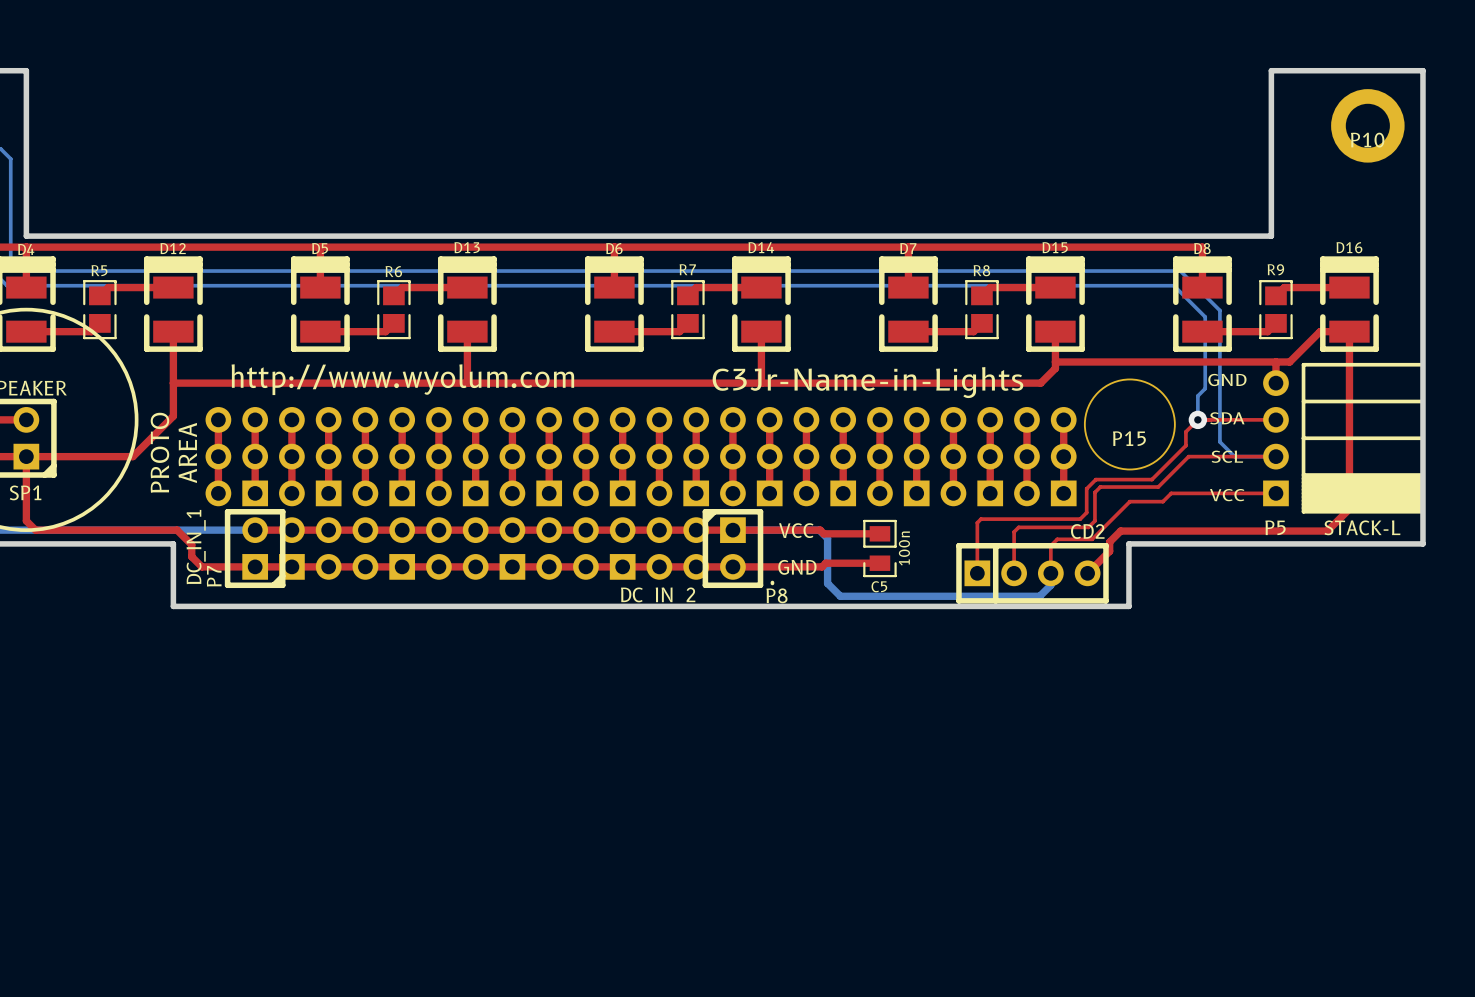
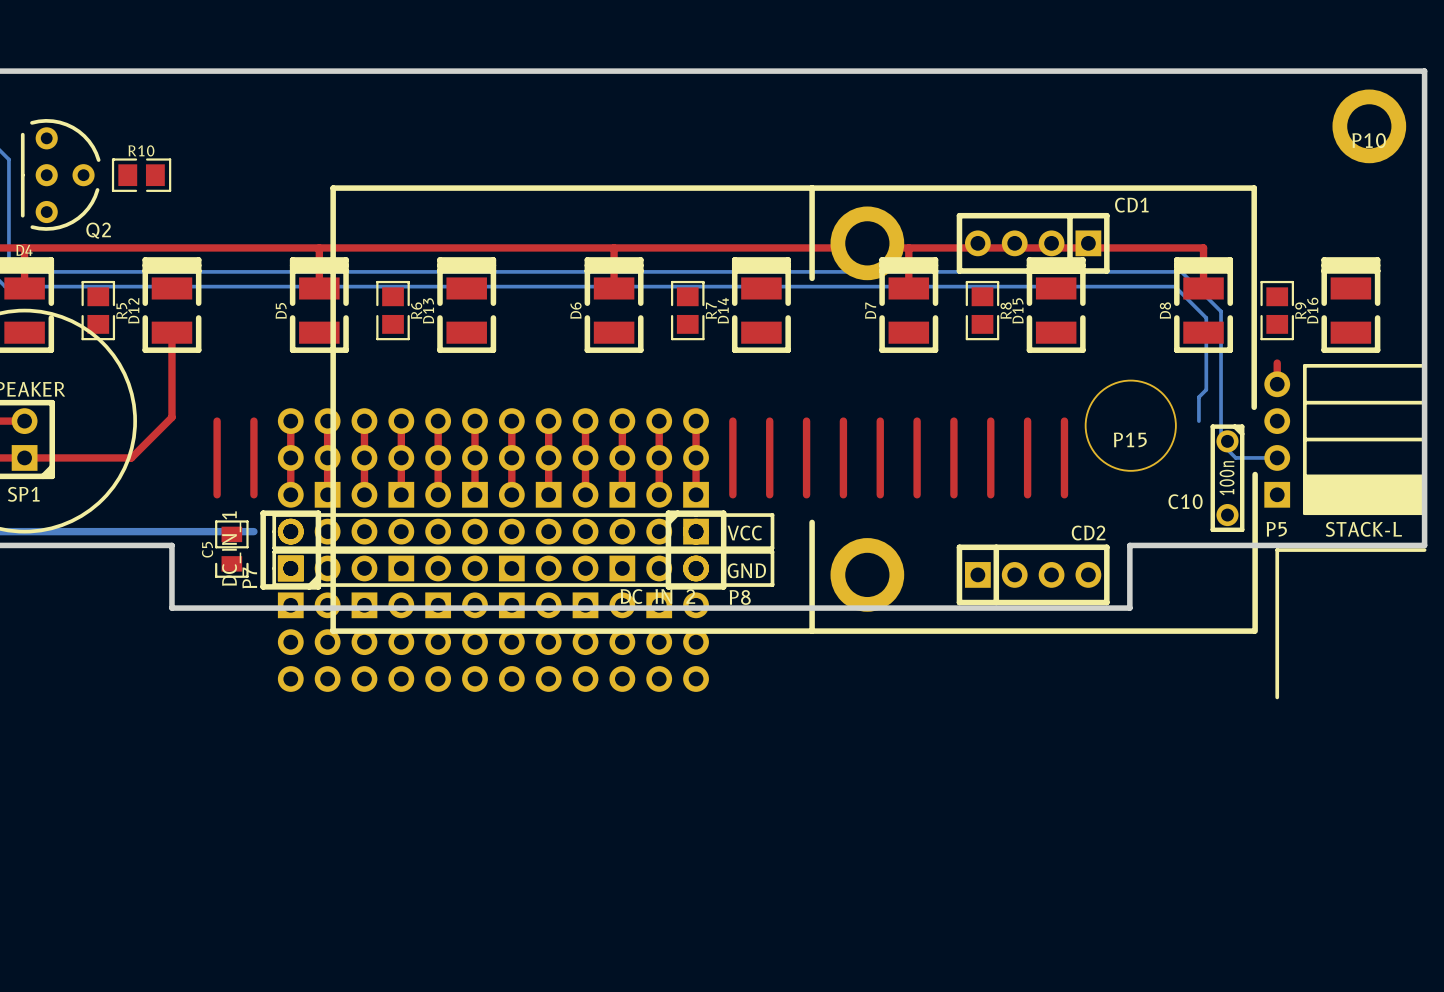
board edge: (26, 70) (26, 236) (1271, 236) (1271, 70) -> (24, 71) (1272, 71)
Q2: none -> (60, 174)
R10: none -> (141, 175)
line: none -> (812, 188) (812, 278)
part: none -> (867, 243)
CD1: none -> (1033, 243)
D13 name rotation: 0° (467, 247) -> 90° counterclockwise (428, 310)
D13 name position: D13 (467, 247) -> D13 (428, 310)
D14 name rotation: 0° (761, 247) -> 90° counterclockwise (723, 310)
D14 name position: D14 (761, 247) -> D14 (723, 310)
D15 name rotation: 0° (1055, 247) -> 90° counterclockwise (1017, 310)
D15 name position: D15 (1055, 247) -> D15 (1017, 310)
D16 name rotation: 0° (1349, 247) -> 90° counterclockwise (1312, 310)
D16 name position: D16 (1349, 247) -> D16 (1312, 310)
D12 name rotation: 0° (173, 248) -> 90° counterclockwise (133, 310)
D12 name position: D12 (173, 248) -> D12 (133, 310)
D5 name rotation: 0° (320, 248) -> 90° counterclockwise (281, 310)
D5 name position: D5 (320, 248) -> D5 (281, 310)
D6 name rotation: 0° (614, 248) -> 90° counterclockwise (575, 310)
D6 name position: D6 (614, 248) -> D6 (575, 310)
D7 name rotation: 0° (908, 248) -> 90° counterclockwise (870, 310)
D7 name position: D7 (908, 248) -> D7 (870, 310)
D8 name rotation: 0° (1202, 248) -> 90° counterclockwise (1165, 310)
D8 name position: D8 (1202, 248) -> D8 (1165, 310)
R7 name rotation: 0° (687, 269) -> 90° counterclockwise (711, 310)
R7 name position: R7 (687, 269) -> R7 (711, 310)
R9 name rotation: 0° (1275, 269) -> 90° counterclockwise (1300, 310)
R9 name position: R9 (1275, 269) -> R9 (1300, 310)
R5 name rotation: 0° (99, 270) -> 90° counterclockwise (121, 310)
R5 name position: R5 (99, 270) -> R5 (121, 310)
R8 name rotation: 0° (981, 270) -> 90° counterclockwise (1006, 310)
R8 name position: R8 (981, 270) -> R8 (1006, 310)
R6 name rotation: 0° (393, 271) -> 90° counterclockwise (416, 310)
R6 name position: R6 (393, 271) -> R6 (416, 310)
top track: (173, 287) (108, 287) (99, 295) -> none
top track: (467, 287) (402, 287) (393, 295) -> none
top track: (761, 287) (696, 287) (687, 295) -> none
top track: (1055, 287) (990, 287) (981, 295) -> none
top track: (1349, 287) (1284, 287) (1275, 295) -> none
top track: (99, 323) (91, 331) (26, 331) -> none
top track: (393, 323) (385, 331) (320, 331) -> none
top track: (687, 323) (679, 331) (614, 331) -> none
top track: (981, 323) (973, 331) (908, 331) -> none
top track: (1275, 323) (1267, 331) (1202, 331) -> none
top track: (467, 331) (467, 383) -> none
top track: (761, 331) (761, 383) -> none
top track: (1055, 331) (1055, 368) (1040, 383) (173, 383) -> none
top track: (1055, 361) (1289, 361) (1320, 331) (1349, 331) (1349, 509) (1327, 531) (1120, 531) (1109, 542) (1109, 551) (1087, 573) -> none
text: http://www.wyolum.com (402, 379) -> none
text: GND (1227, 379) -> none
text: C3Jr-Name-in-Lights (867, 382) -> none
line: none -> (1254, 407) (1254, 188) (333, 188) (333, 631) (1254, 631)
text: SDA (1227, 418) -> none
via: (1197, 419) -> none
top track: (1275, 419) (1197, 419) (1185, 431) (1185, 445) (1151, 479) (1095, 479) (1086, 488) (1086, 512) (1080, 519) (981, 519) (977, 522) (977, 573) -> none
text: PROTO (159, 452) -> none
text: AREA (187, 452) -> none
top track: (26, 456) (26, 520) (35, 530) (177, 530) (191, 544) (191, 556) (201, 566) (822, 566) (825, 563) (879, 563) -> none
part: (236, 456) -> none
part: (751, 456) -> none
part: (824, 456) -> none
part: (898, 456) -> none
part: (971, 456) -> none
part: (1045, 456) -> none
text: SCL (1227, 456) -> none
top track: (1275, 456) (1188, 456) (1158, 487) (1100, 487) (1094, 492) (1094, 520) (1088, 527) (1018, 527) (1014, 531) (1014, 573) -> none
line: none -> (1255, 474) (1255, 631)
C10: none -> 100n (1227, 478)
top track: (1275, 493) (1171, 493) (1162, 501) (1129, 501) (1092, 539) (1057, 539) (1050, 545) (1050, 573) -> none
text: VCC (1227, 495) -> none
line: none -> (274, 515) (274, 548) (772, 548) (772, 515) (274, 515)
line: none -> (812, 522) (812, 631)
top track: (255, 530) (820, 530) (823, 533) (879, 533) -> none
bottom track: (732, 530) (819, 530) (827, 538) (827, 583) (840, 596) (1039, 596) (1050, 585) (1050, 573) -> none
text position: VCC (796, 530) -> VCC (744, 533)
P7 position: (255, 548) -> (290, 550)
P8 position: (732, 548) -> (696, 550)
C5 position: (879, 548) -> (231, 549)
C5 value: 100n (904, 548) -> none
line: none -> (1424, 550) (1277, 550) (1277, 697)
text position: GND (797, 567) -> GND (746, 570)
part: none -> (867, 574)
line: none -> (772, 584) (772, 551) (274, 551) (274, 585) (772, 585)
C5 name rotation: 0° (879, 586) -> 90° counterclockwise (207, 549)
C5 name position: C5 (879, 586) -> C5 (207, 549)
part: none -> (309, 642)
part: none -> (382, 642)
part: none -> (456, 642)
part: none -> (530, 642)
part: none -> (603, 642)
part: none -> (677, 642)

